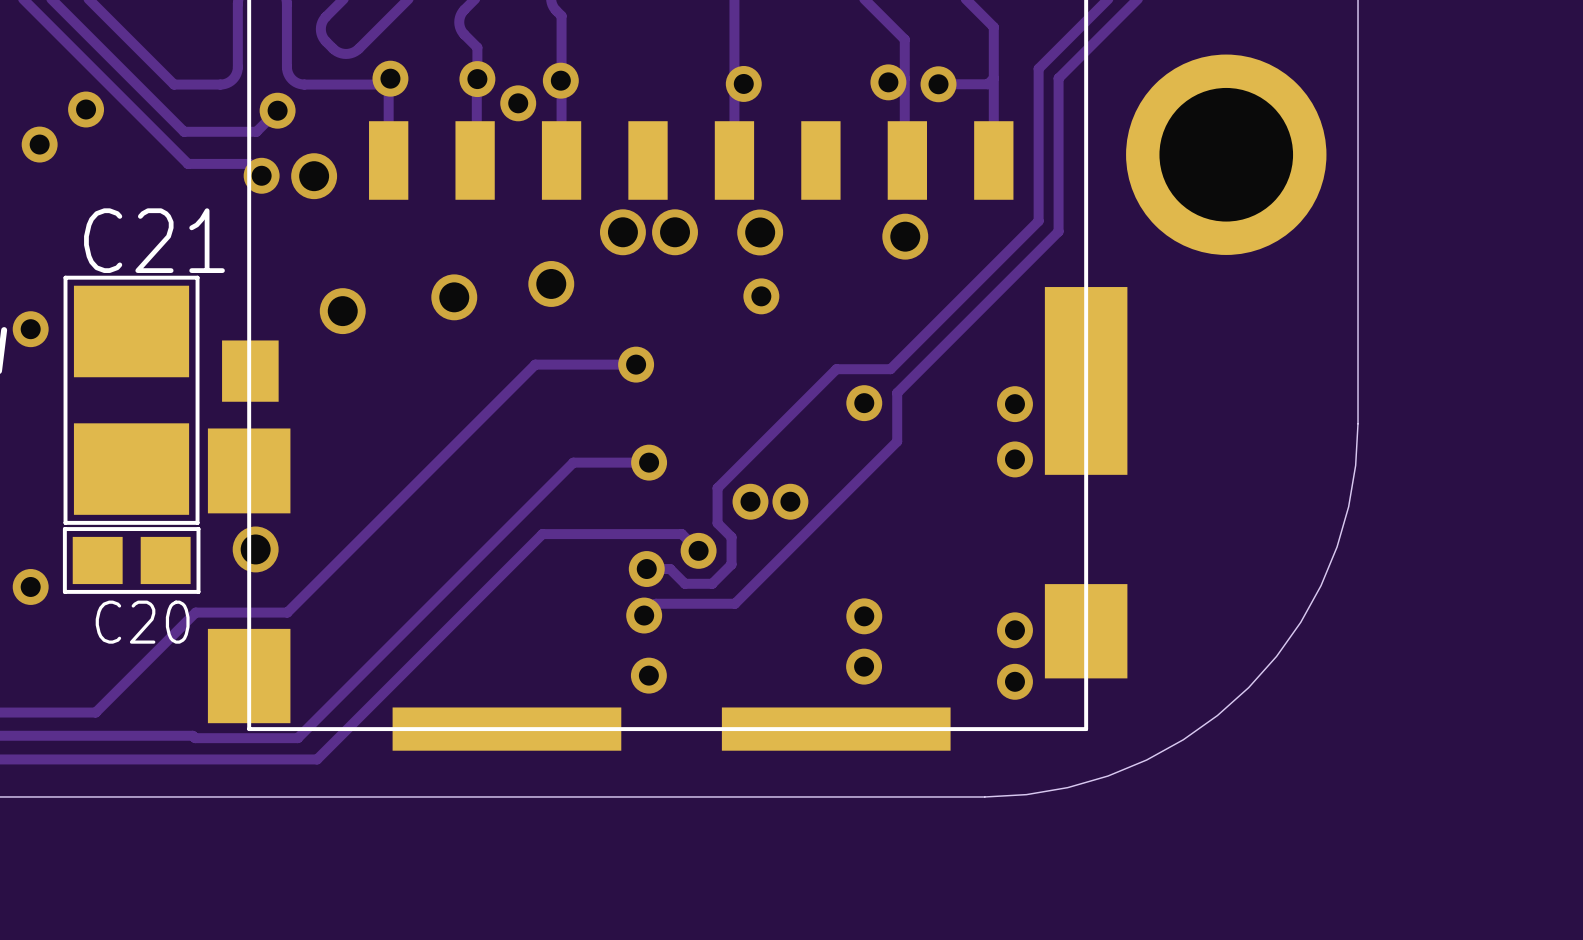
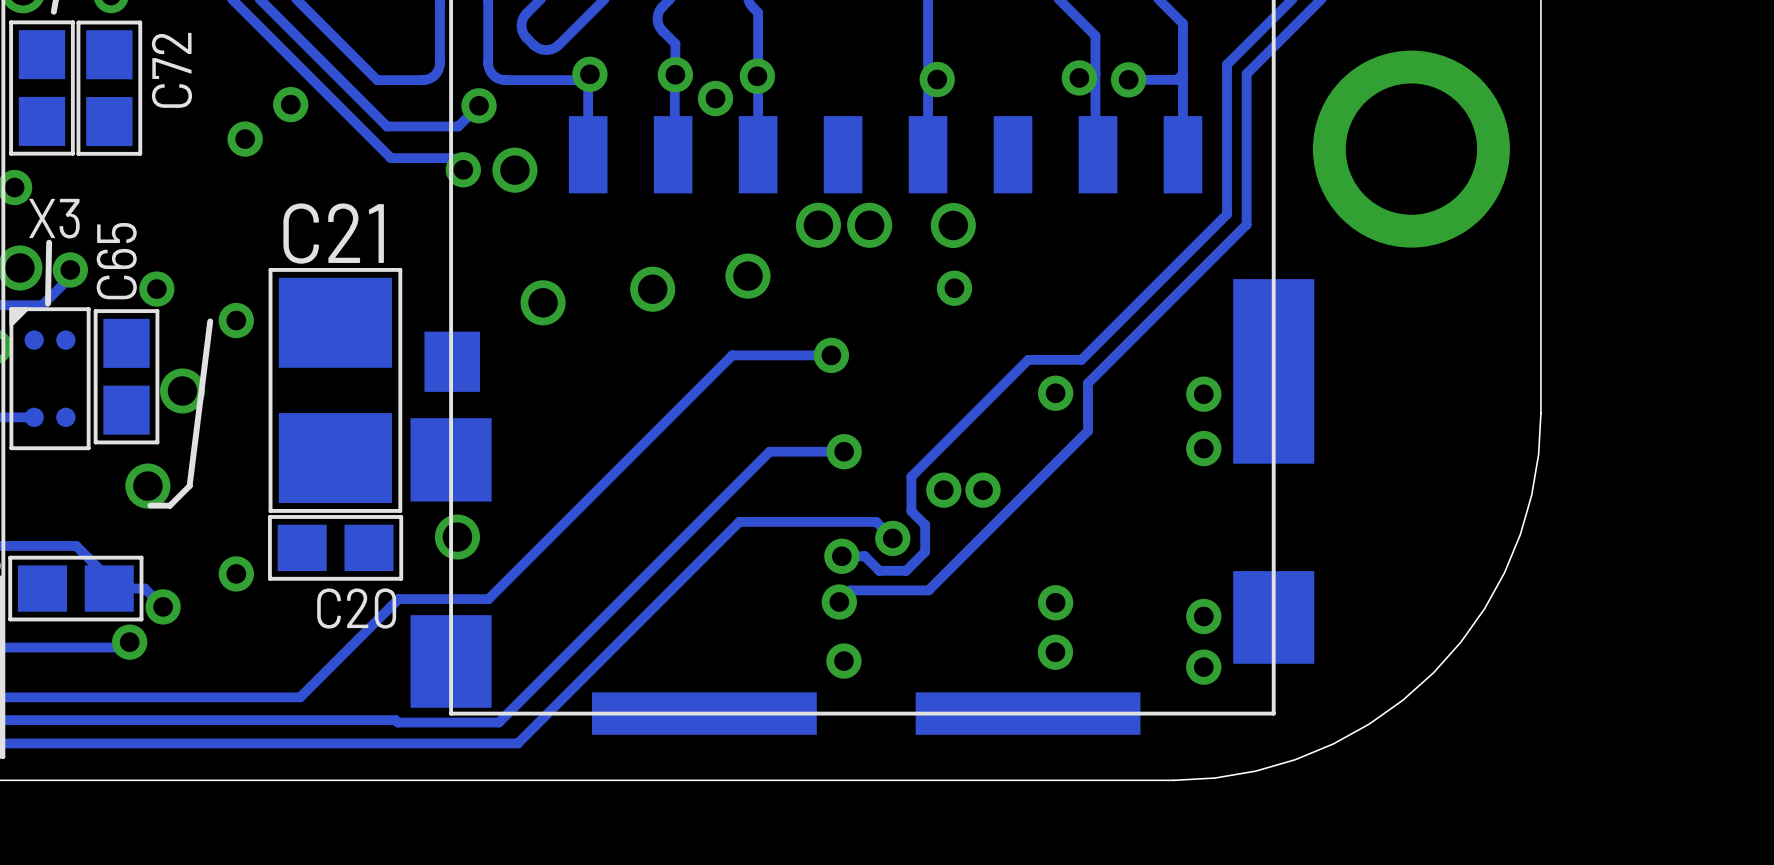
via: (905, 236) -> none

